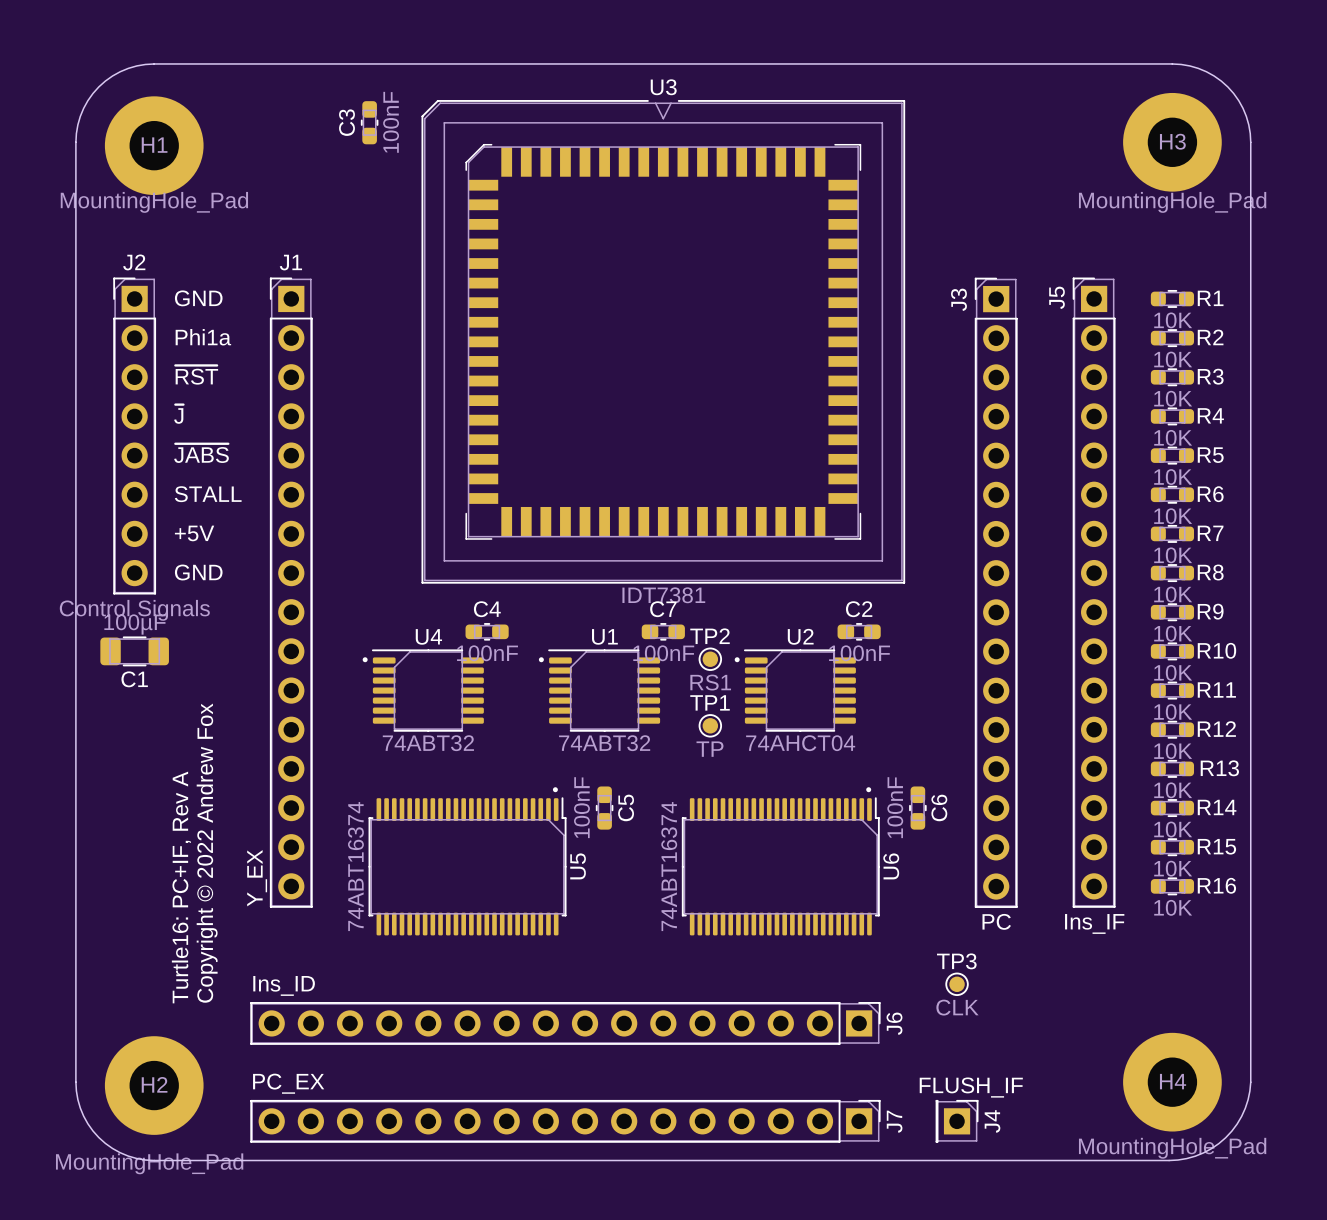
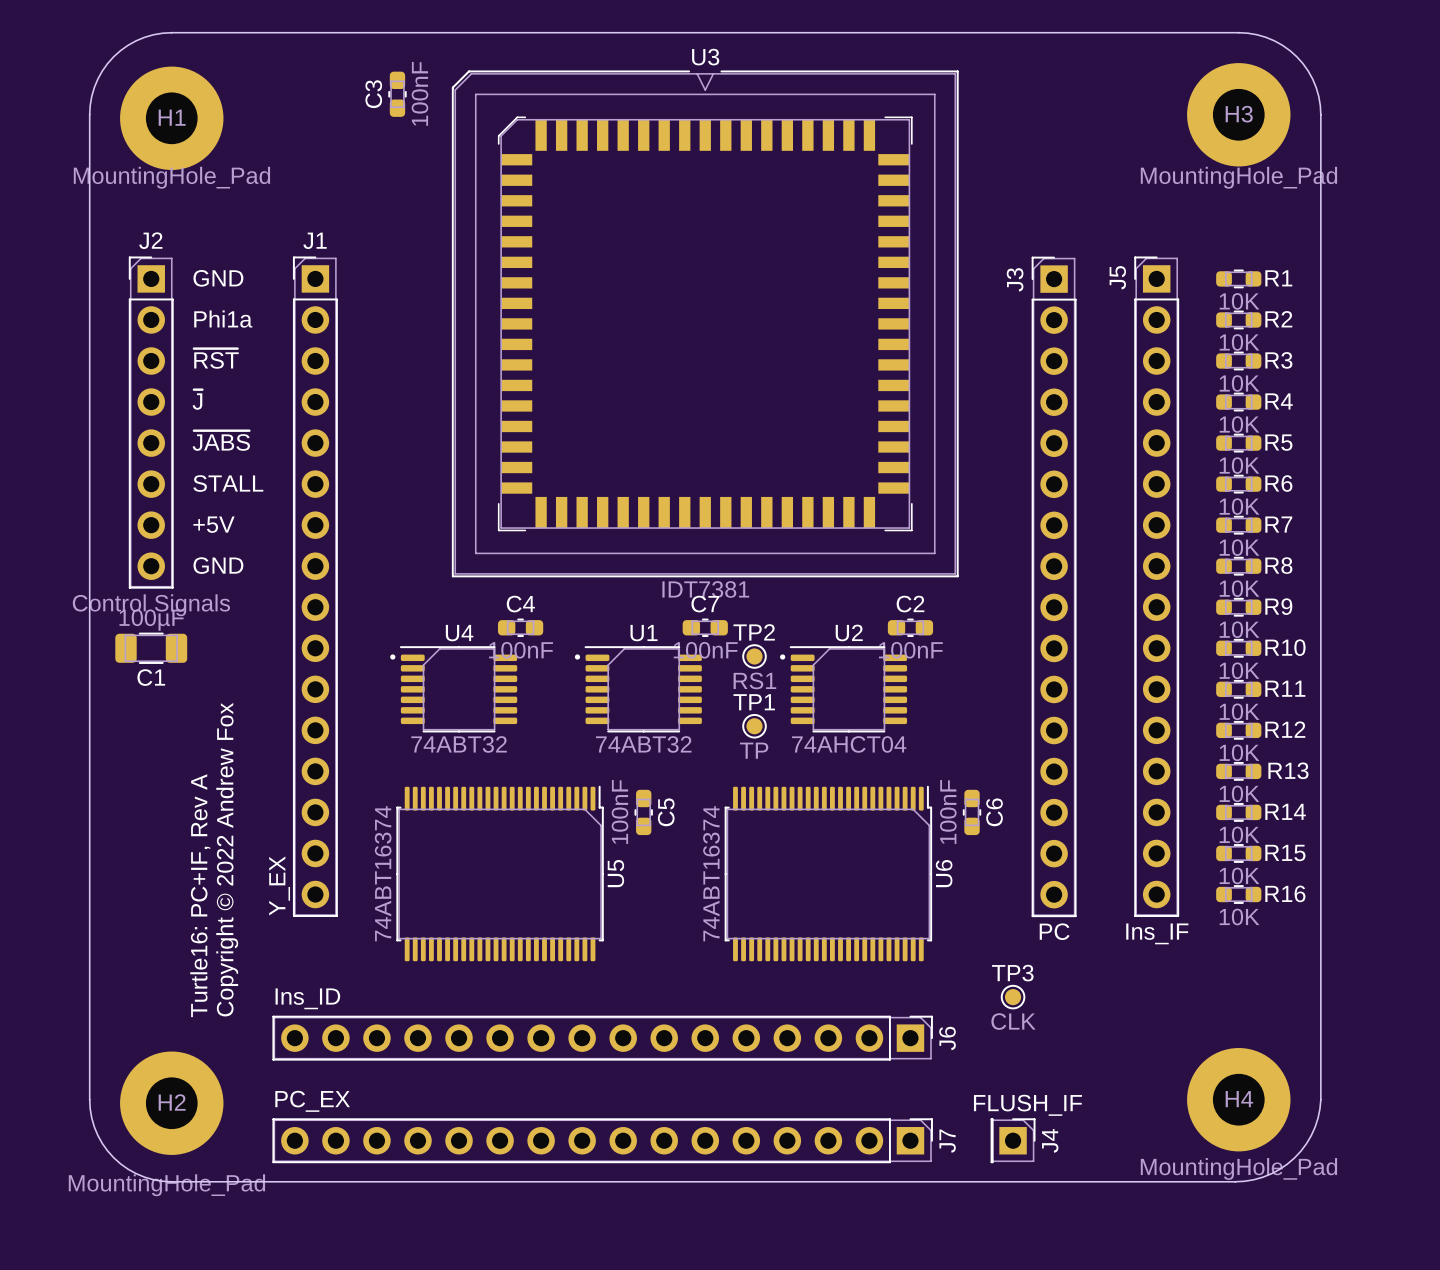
U5 footprint: [368, 787, 567, 936] -> [396, 785, 604, 962]
U6 footprint: [681, 787, 880, 936] -> [724, 785, 933, 962]

